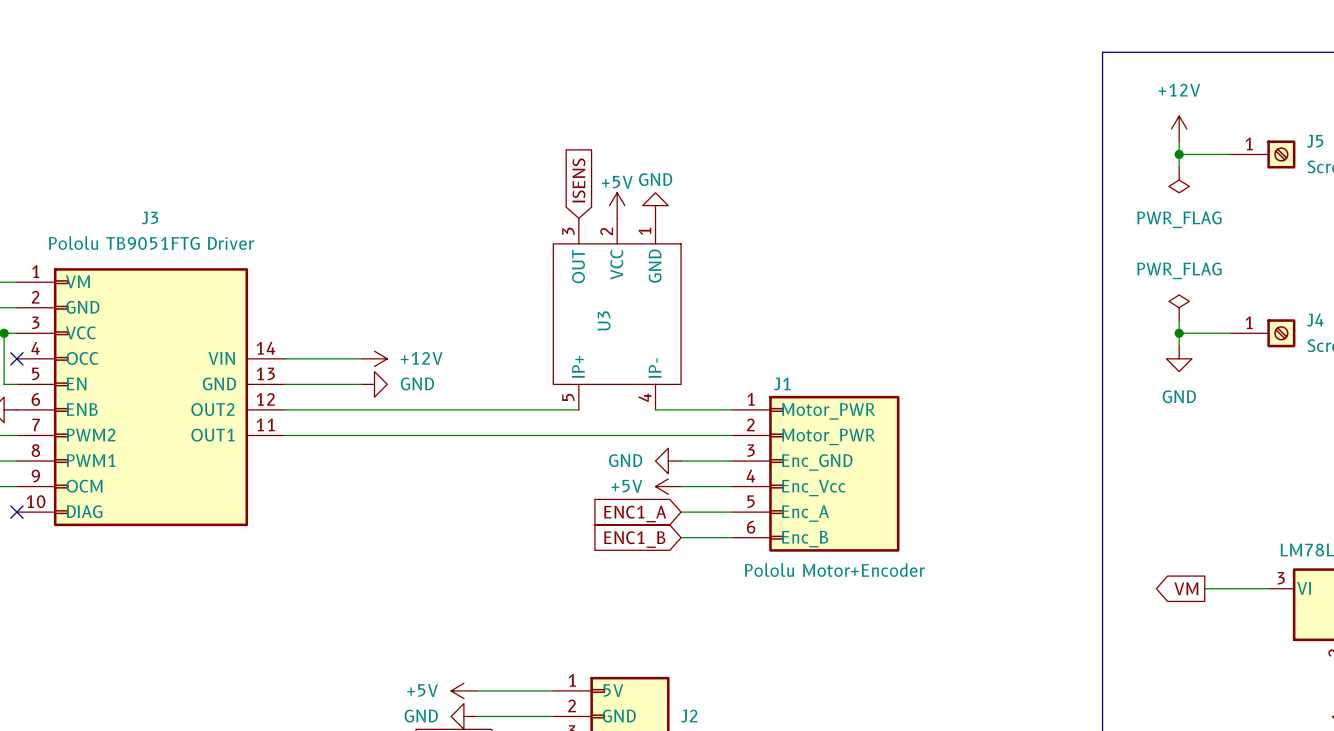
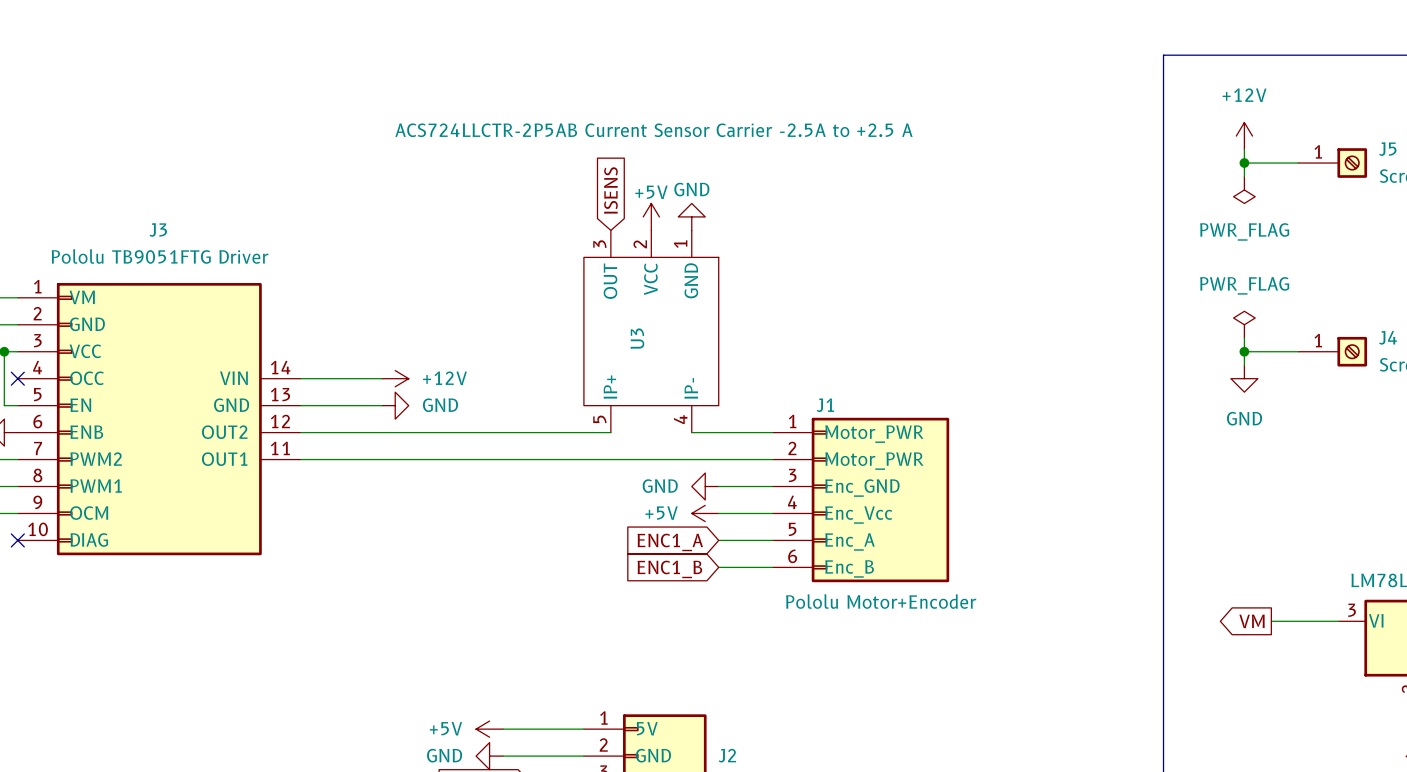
U3 value: none -> ACS724LLCTR-2P5AB Current Sensor Carrier -2.5A to +2.5 A (654, 130)

